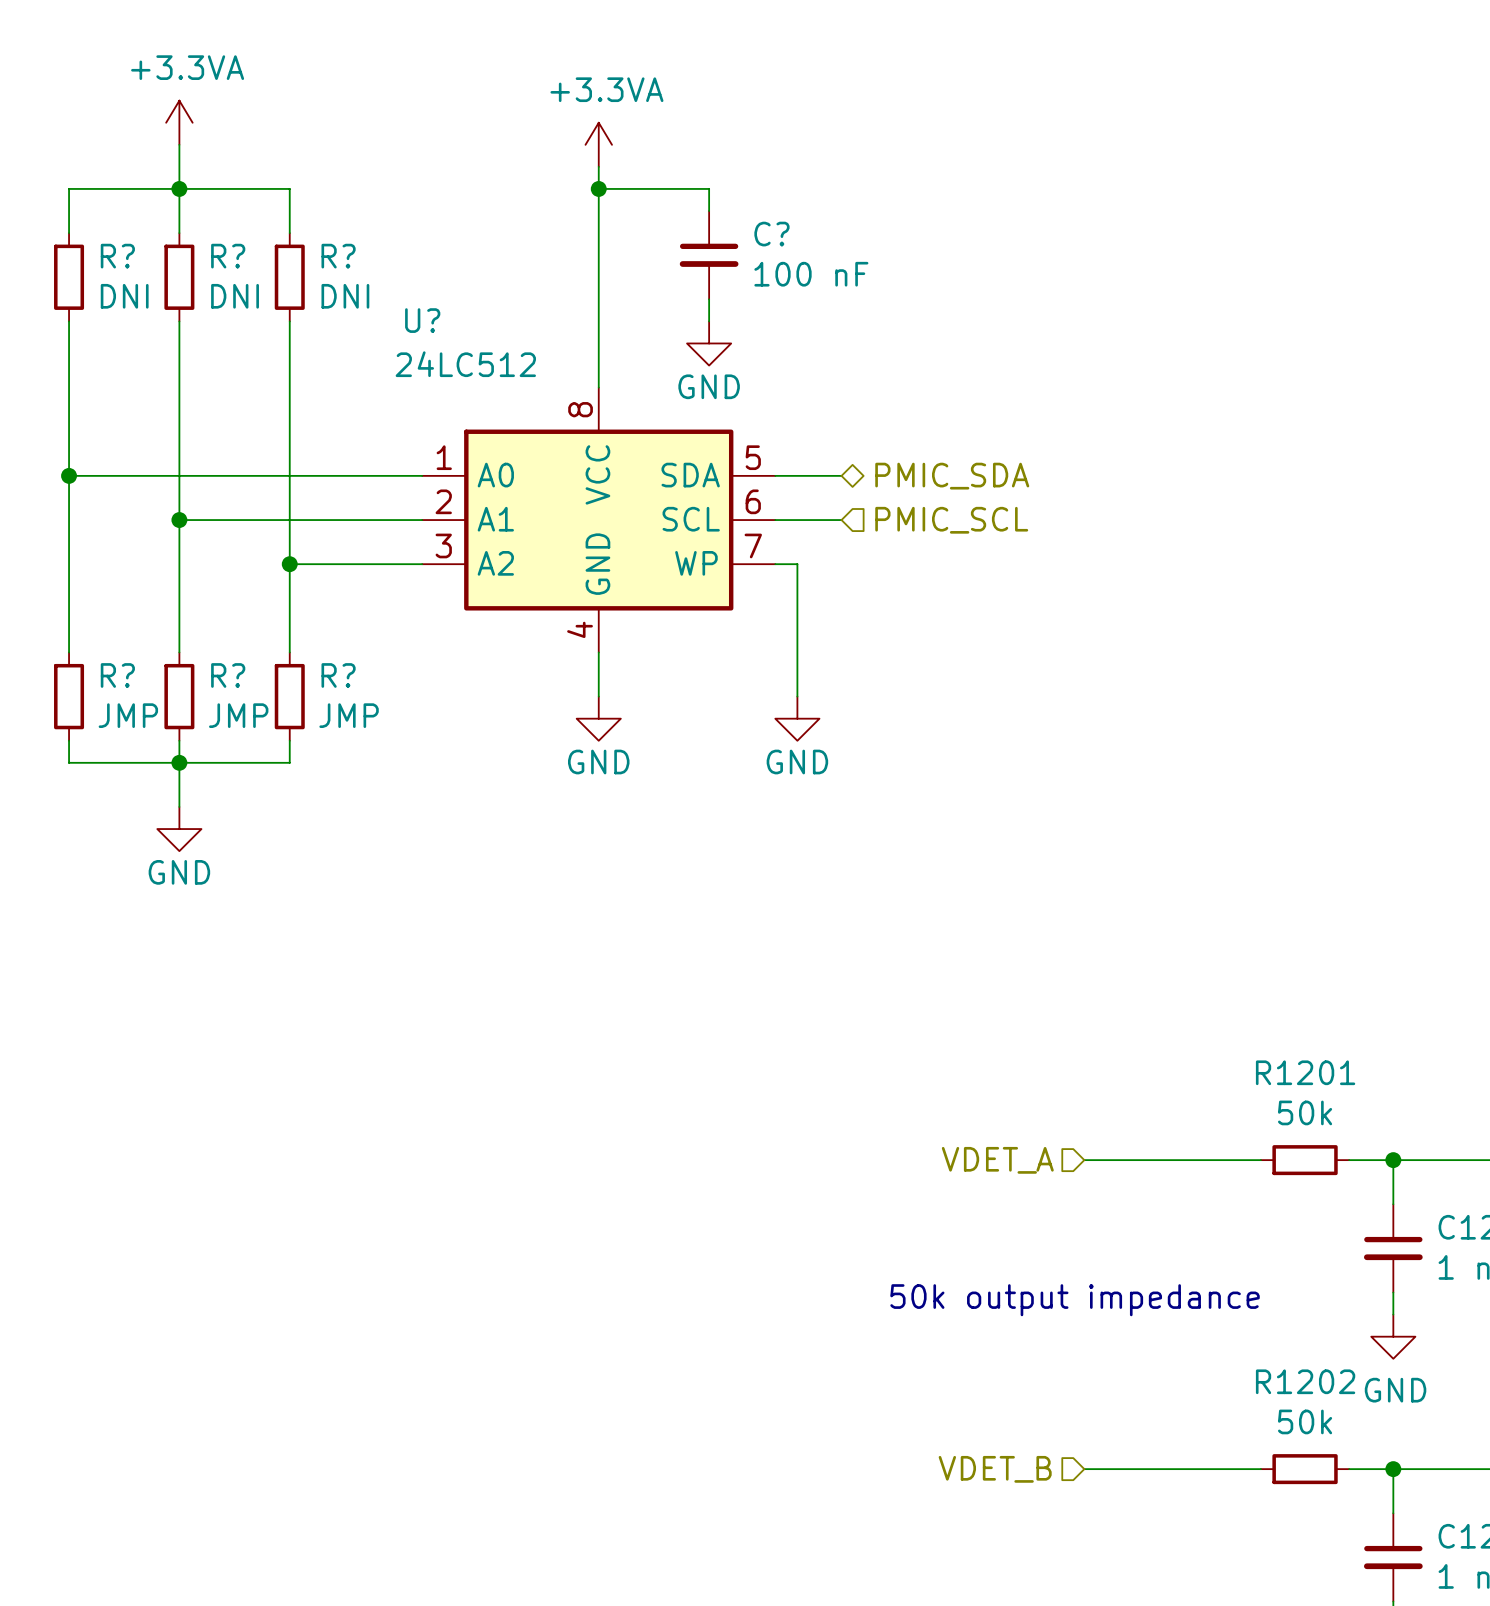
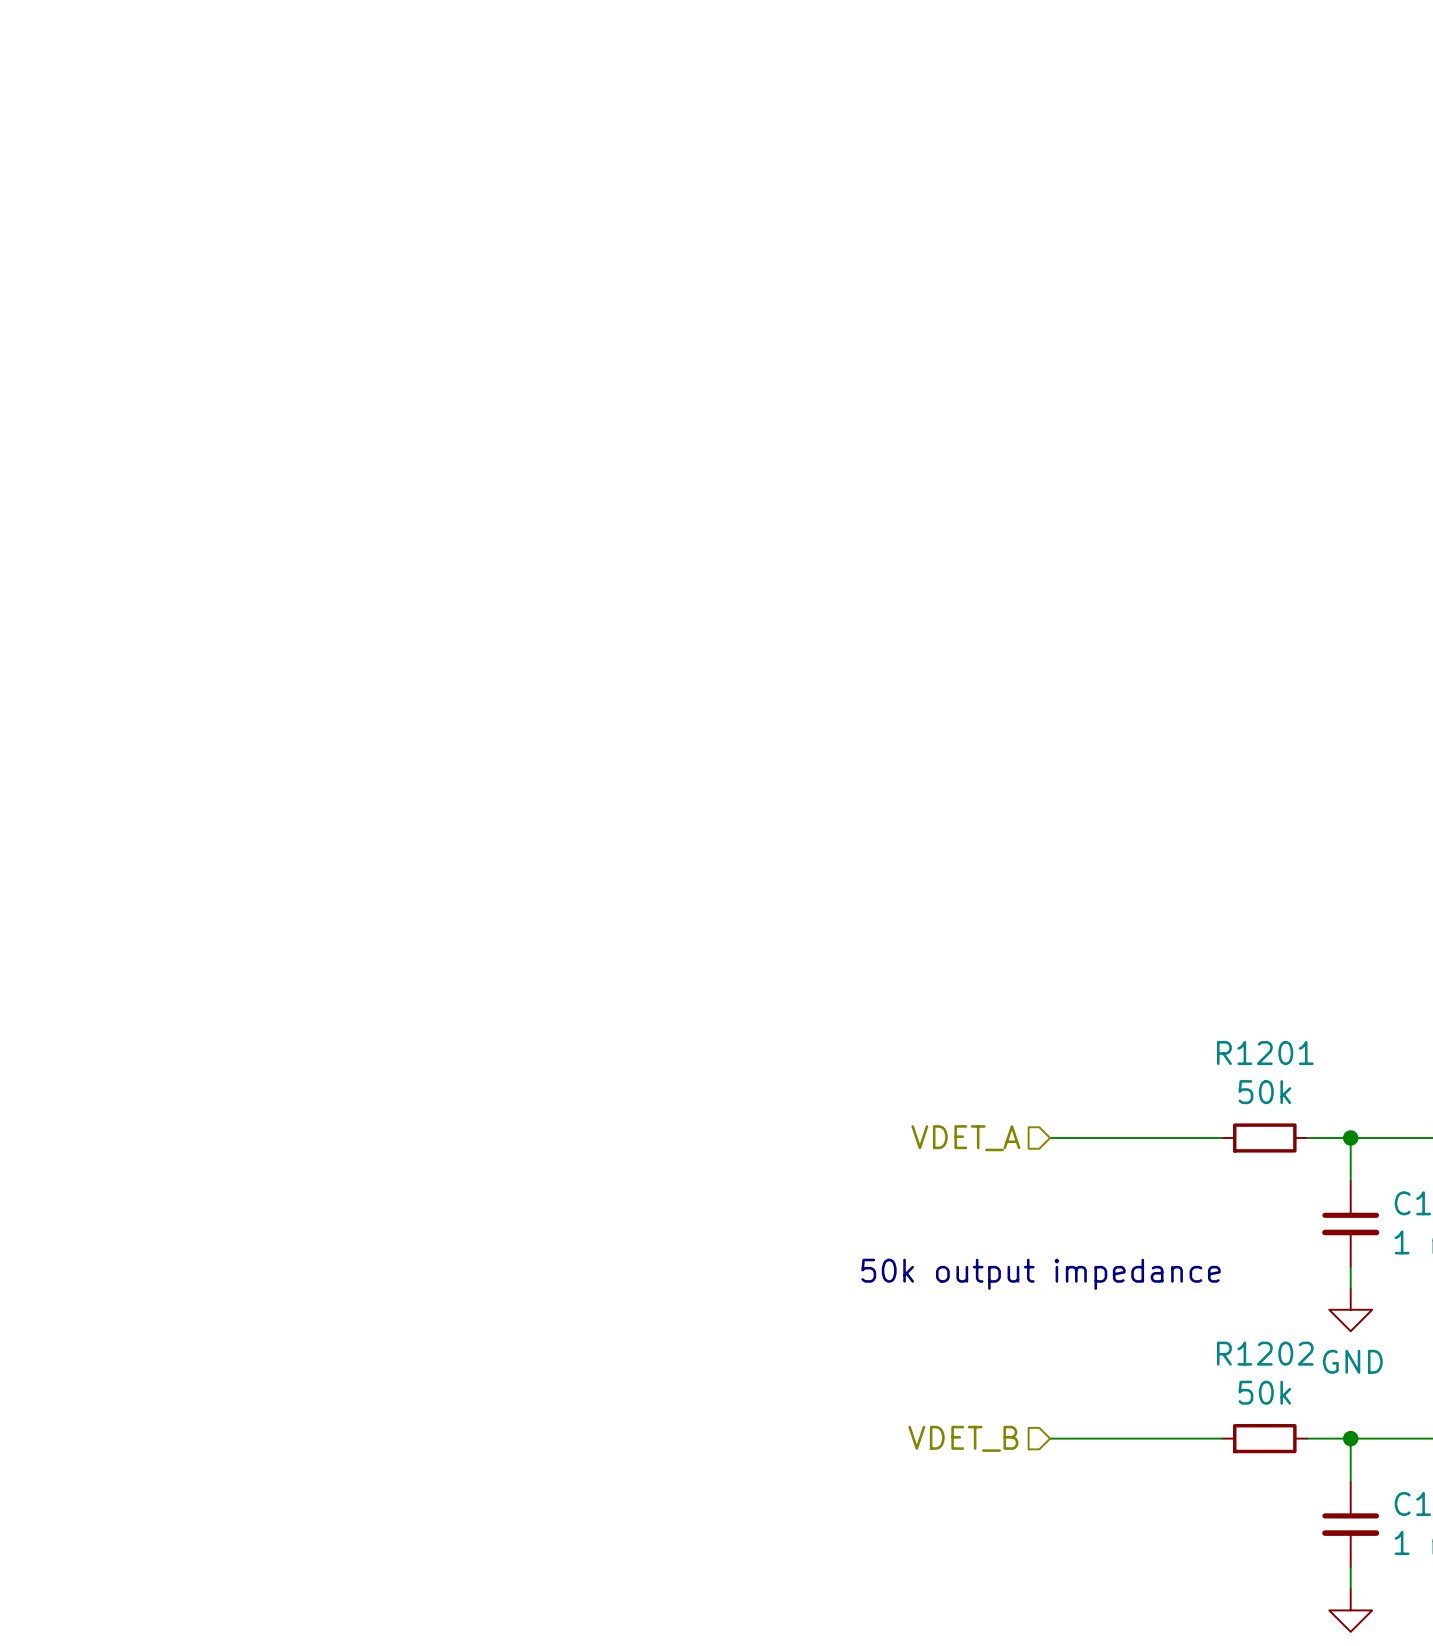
power symbol: +3.3VA (179, 122) -> none
wire: (179, 144) (179, 233) -> none
power symbol: +3.3VA (598, 144) -> none
wire: (598, 166) (598, 387) -> none
junction: (179, 188) -> none
wire: (598, 188) (709, 188) (709, 211) -> none
junction: (598, 188) -> none
wire: (69, 233) (69, 188) (289, 188) (289, 233) -> none
C?: 100 nF (709, 255) -> none
R?: DNI (69, 277) -> none
R?: DNI (179, 277) -> none
R?: DNI (289, 277) -> none
wire: (709, 299) (709, 321) -> none
wire: (69, 321) (69, 652) -> none
wire: (179, 321) (179, 652) -> none
wire: (289, 321) (289, 652) -> none
power symbol: GND (709, 343) -> none
wire: (69, 475) (422, 475) -> none
junction: (69, 475) -> none
wire: (775, 475) (841, 475) -> none
hierarchical label: PMIC_SDA (952, 476) -> none
wire: (179, 520) (422, 520) -> none
junction: (179, 520) -> none
U?: 24LC512 (598, 520) -> none
wire: (775, 520) (841, 520) -> none
hierarchical label: PMIC_SCL (951, 520) -> none
wire: (289, 564) (422, 564) -> none
junction: (289, 564) -> none
wire: (775, 564) (797, 564) (797, 696) -> none
wire: (598, 652) (598, 696) -> none
R?: JMP (69, 696) -> none
R?: JMP (179, 696) -> none
R?: JMP (289, 696) -> none
power symbol: GND (598, 718) -> none
power symbol: GND (797, 718) -> none
wire: (69, 740) (69, 762) (289, 762) (289, 740) -> none
wire: (179, 740) (179, 806) -> none
junction: (179, 762) -> none
power symbol: GND (179, 829) -> none

